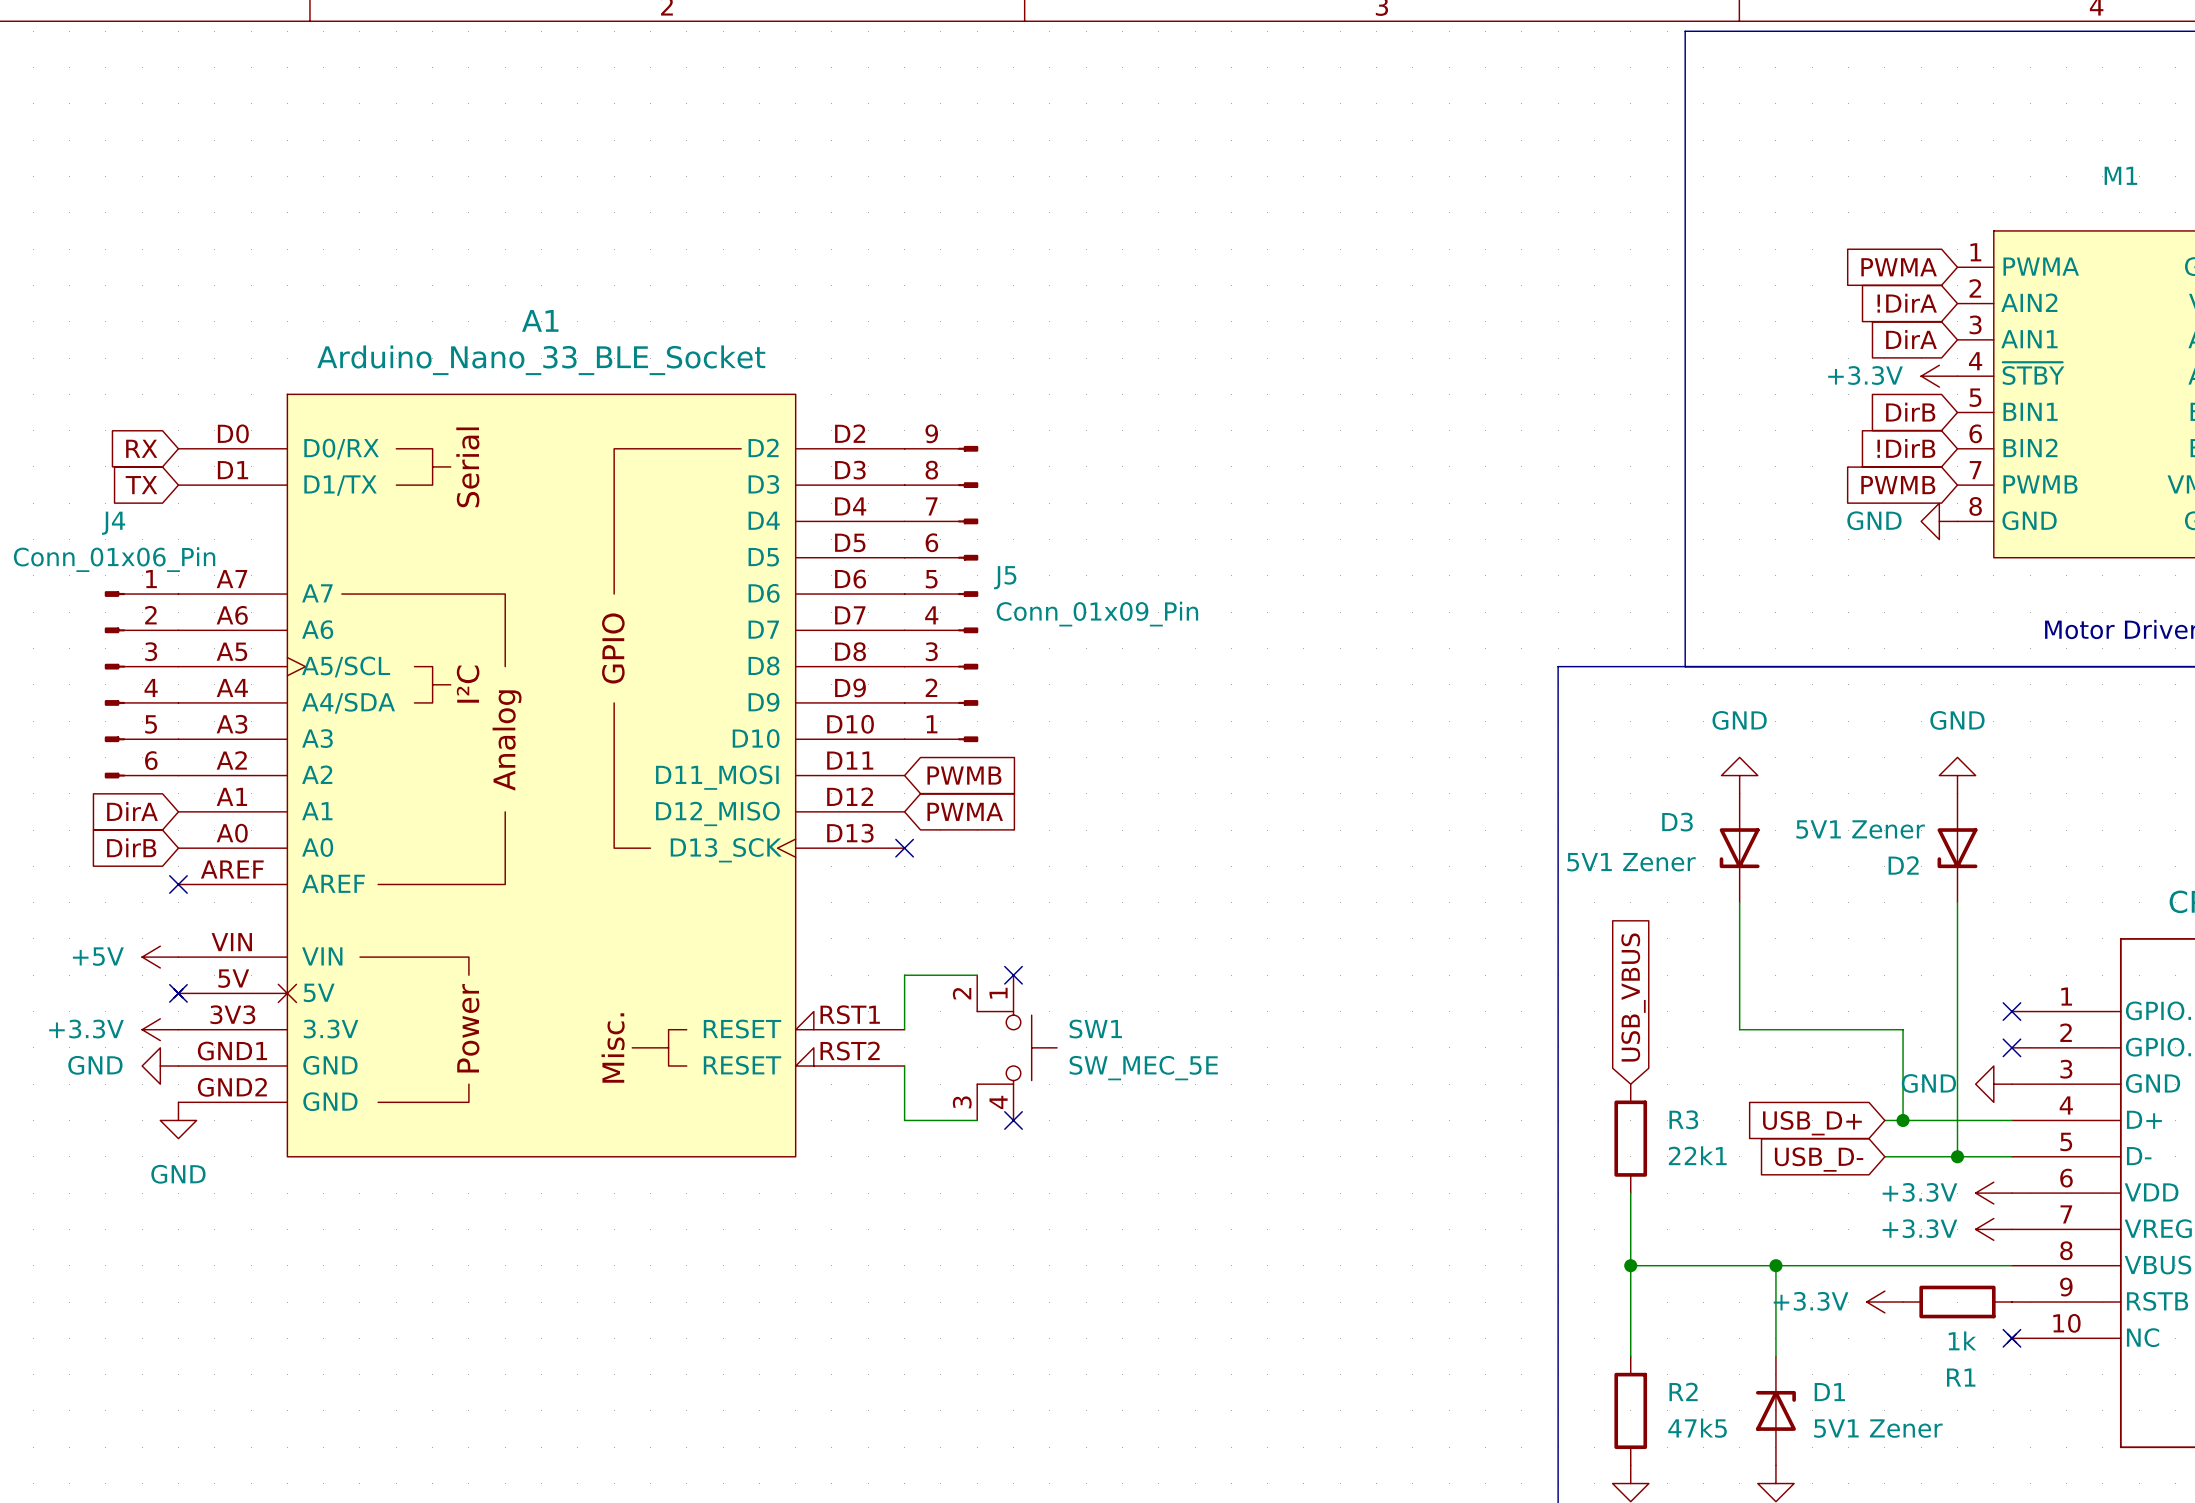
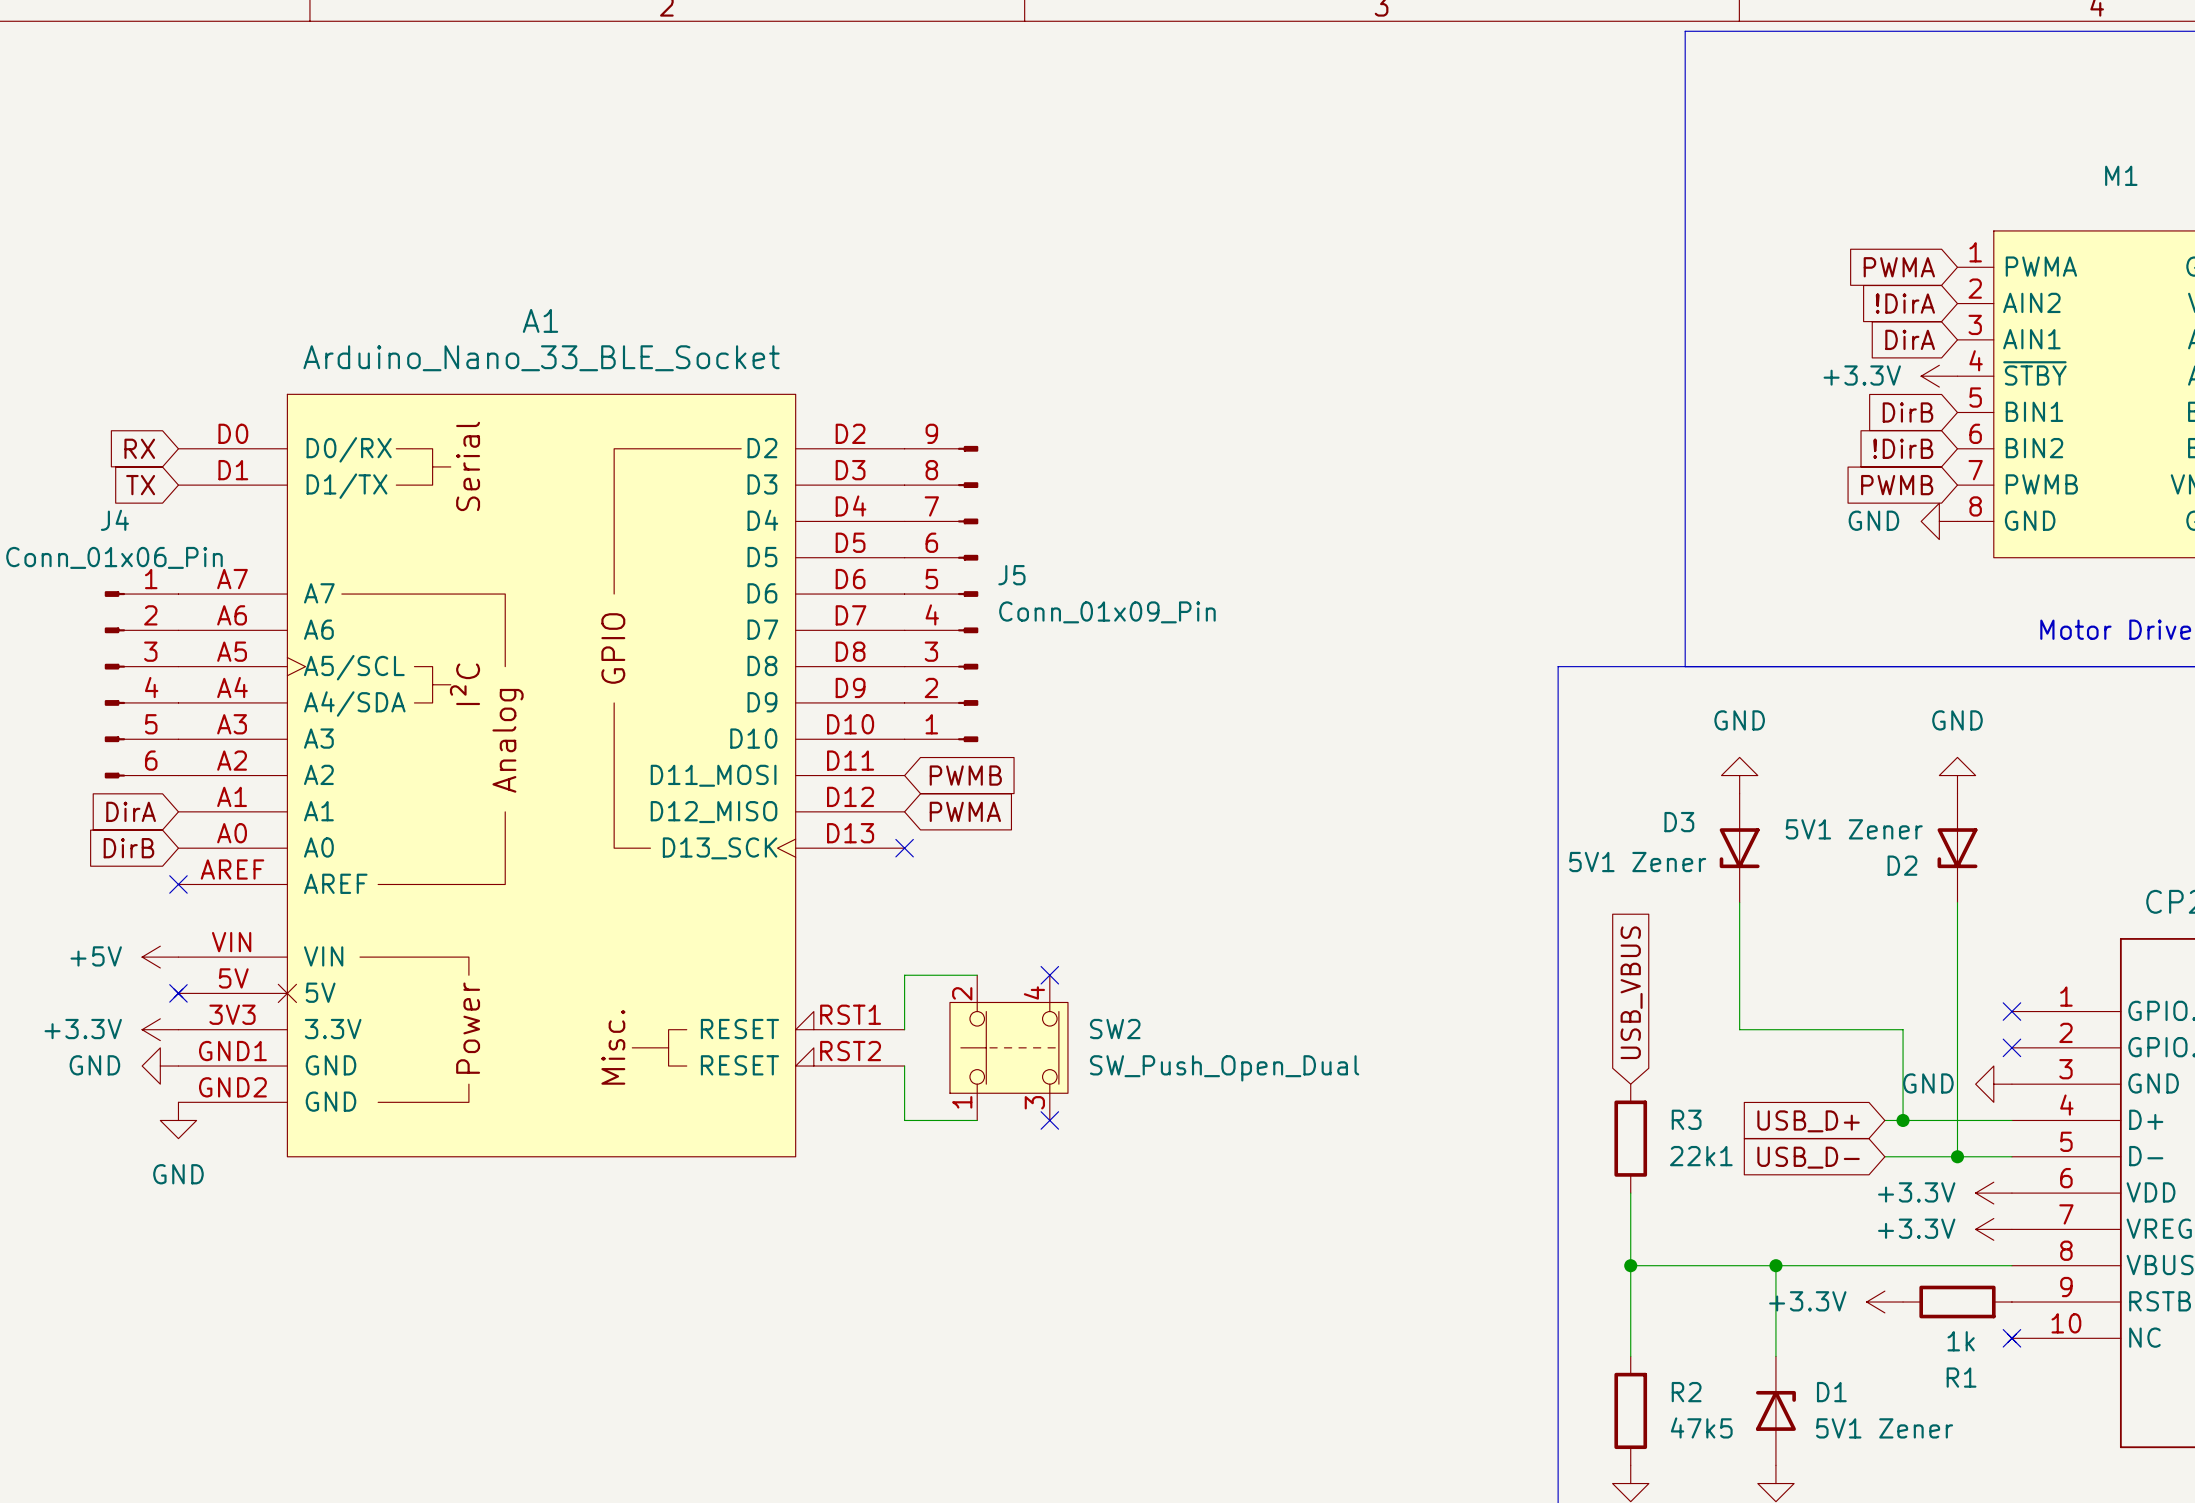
no-connect mark position: (1013, 975) -> (1049, 975)
SW2: none -> SW_Push_Open_Dual (1008, 1047)
SW1: SW_MEC_5E (1017, 1047) -> none
no-connect mark position: (1013, 1120) -> (1049, 1120)

